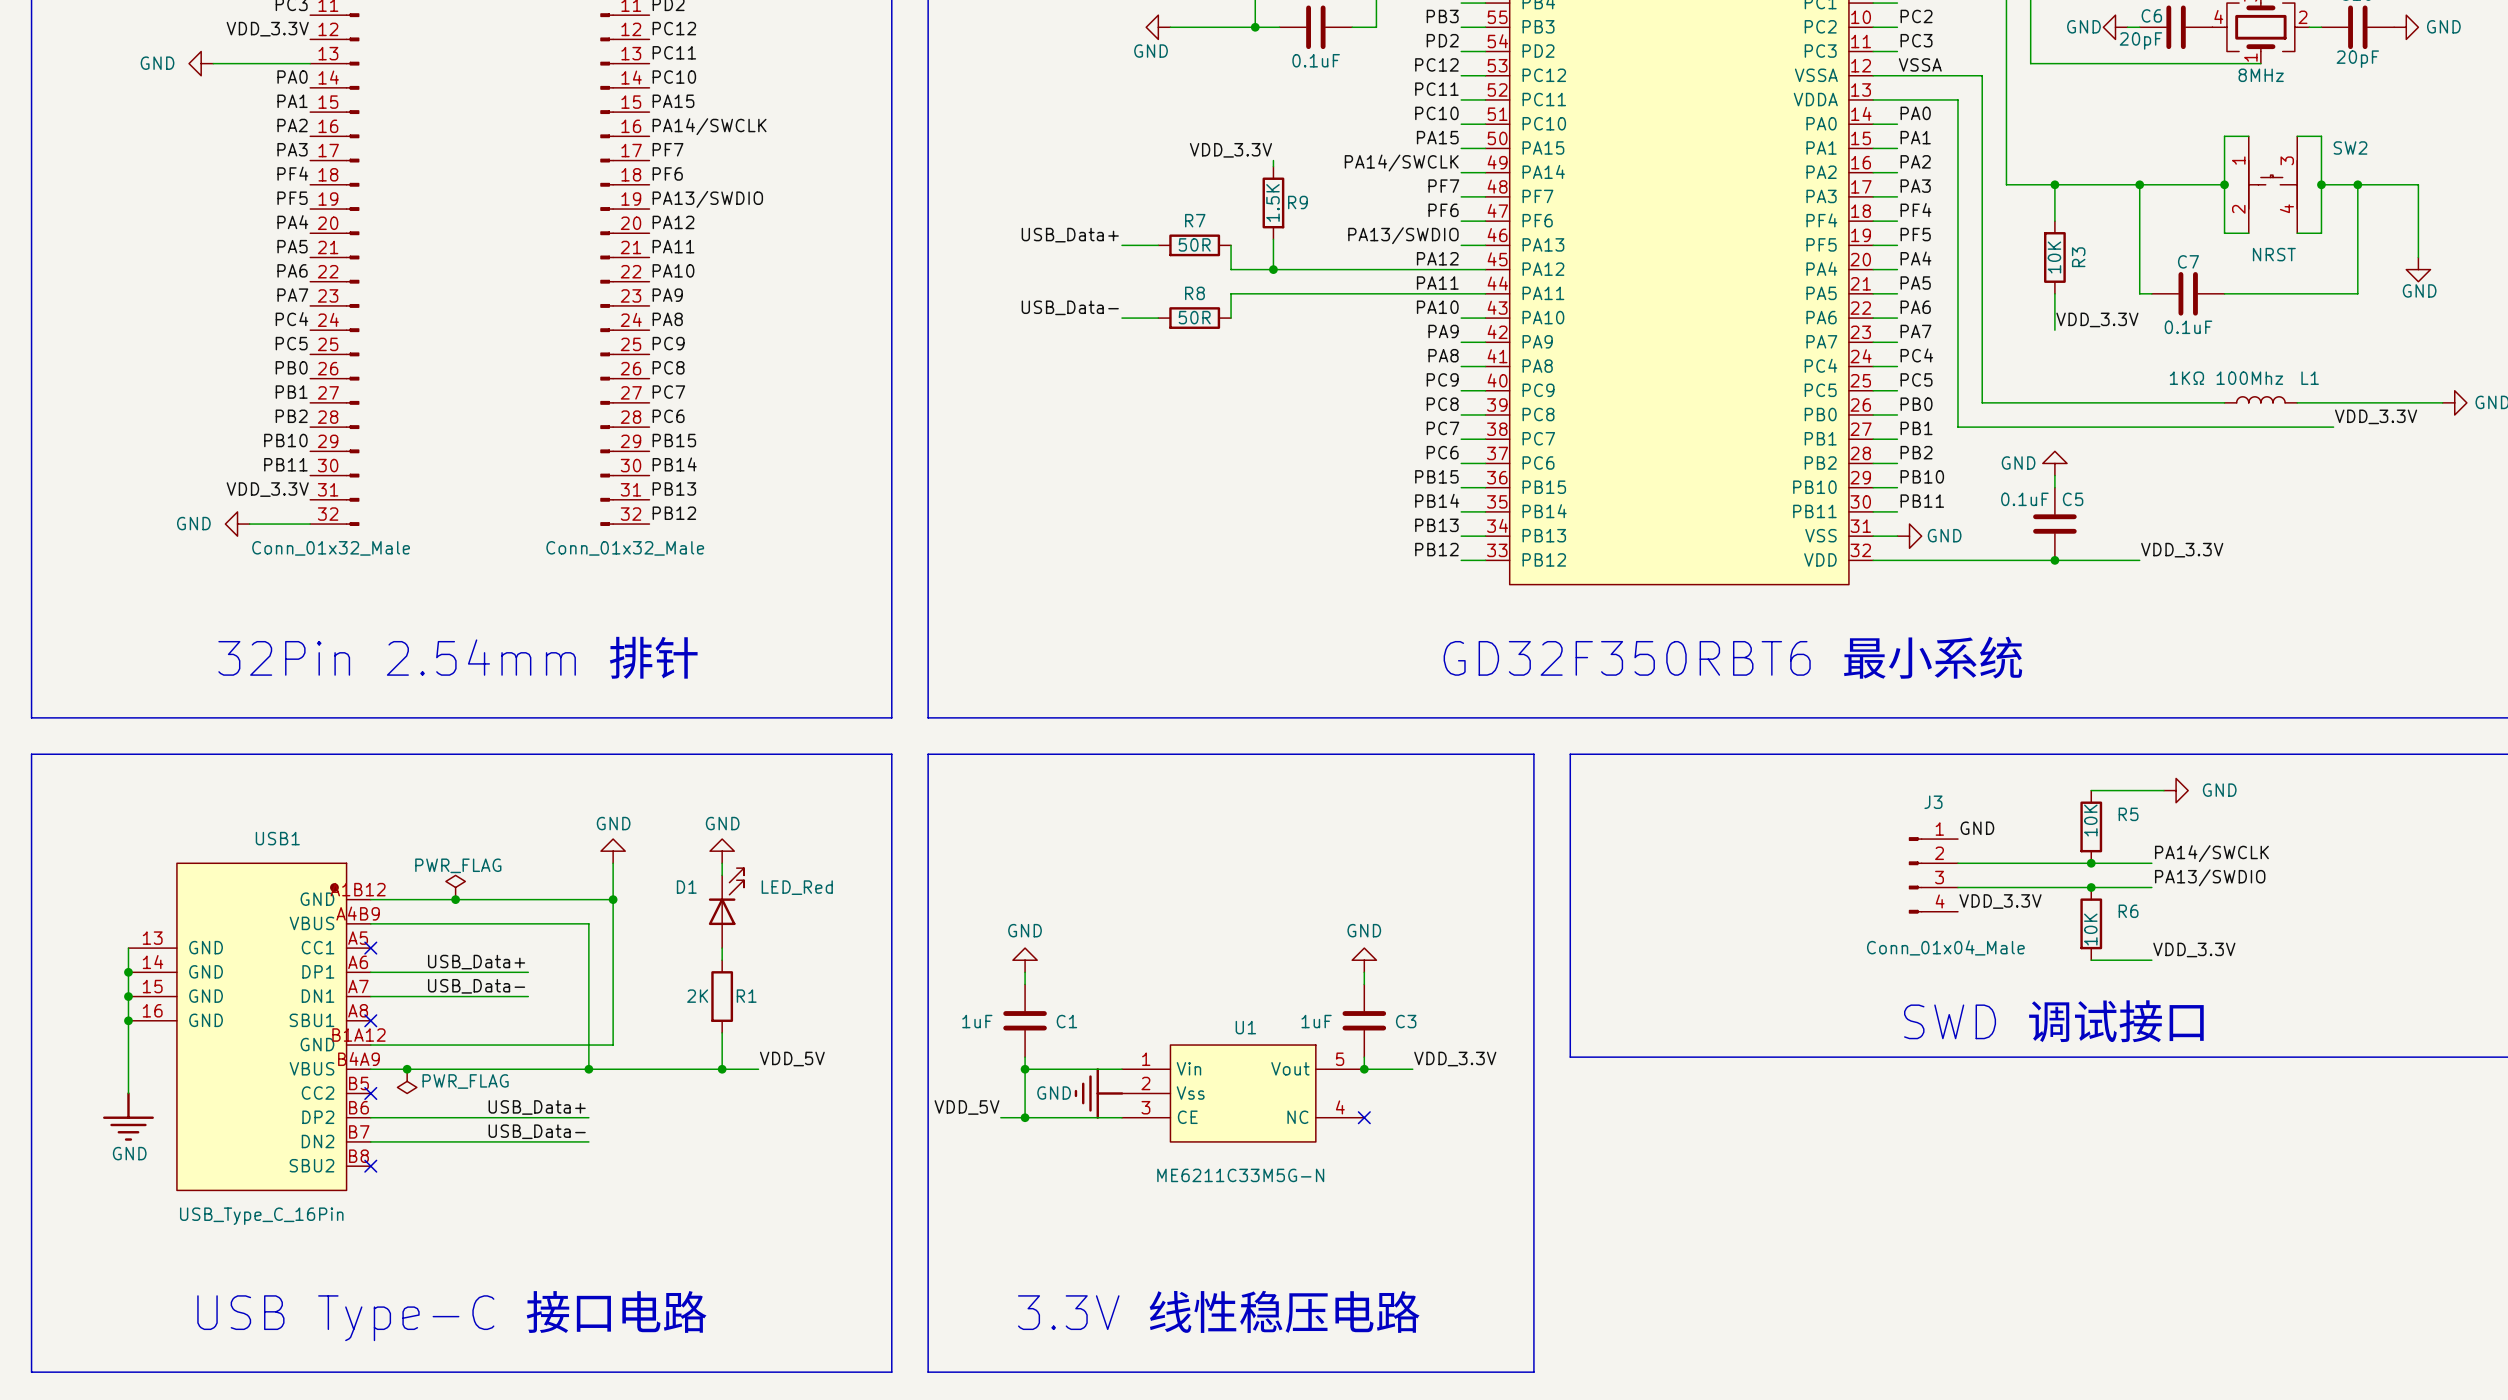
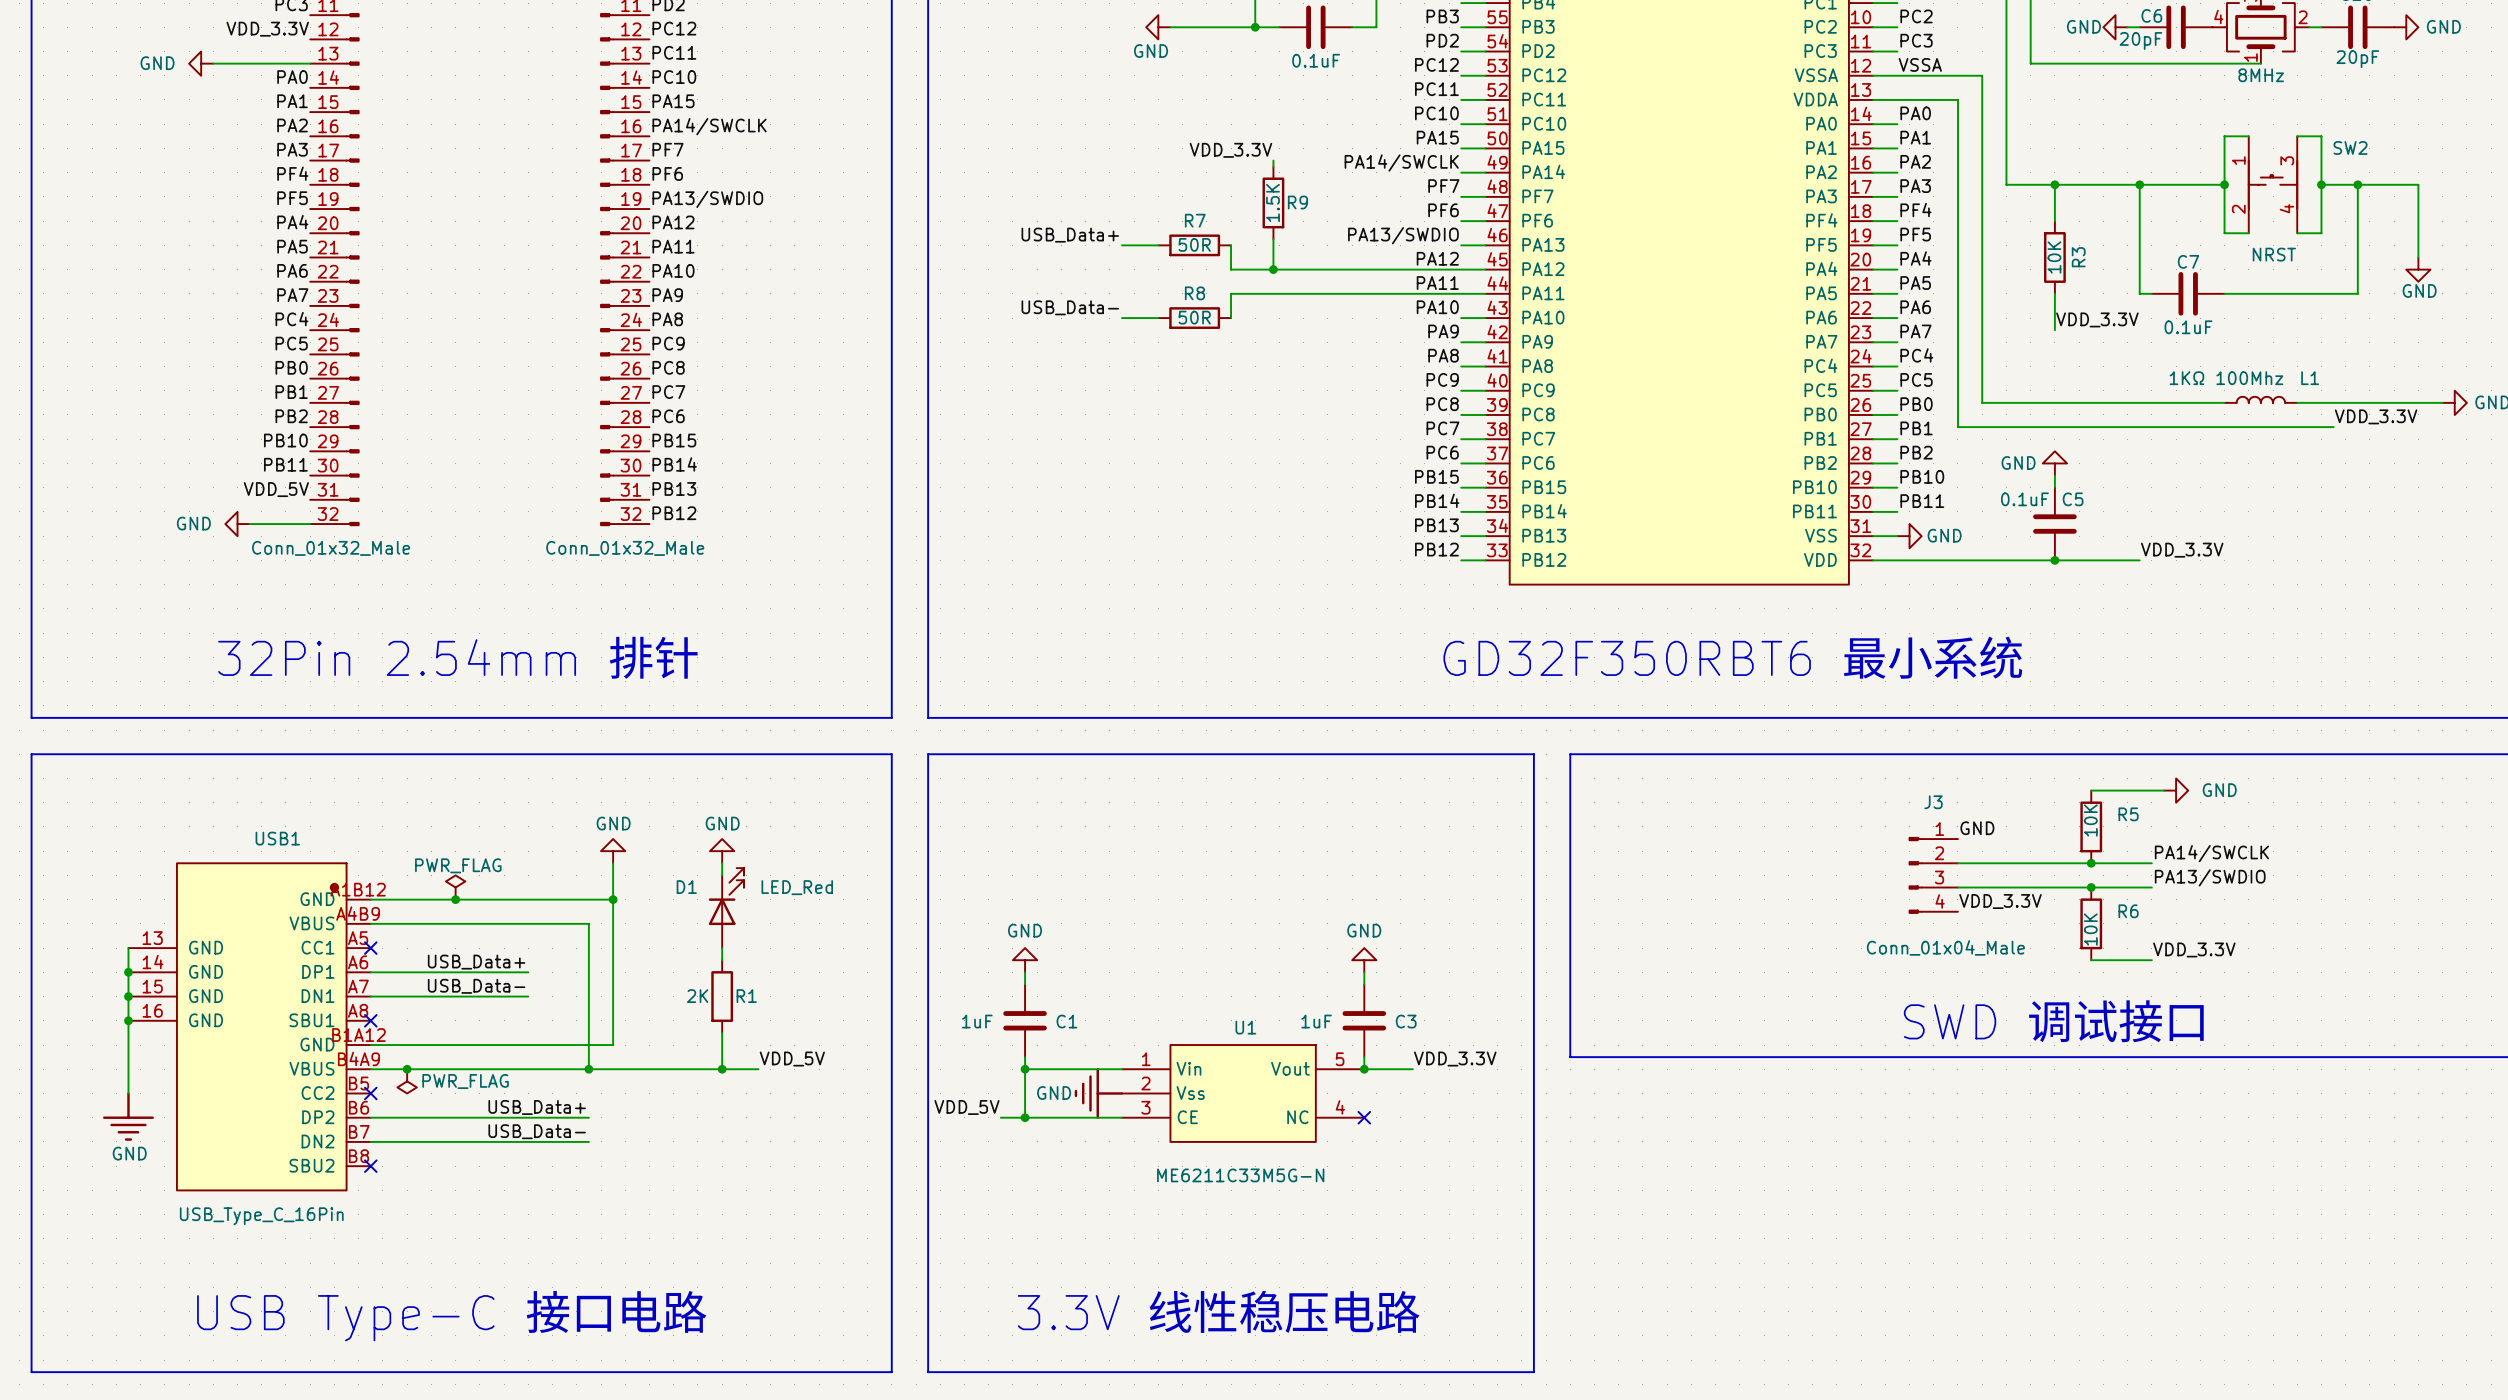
label: VDD_3.3V (267, 489) -> VDD_5V (276, 489)

